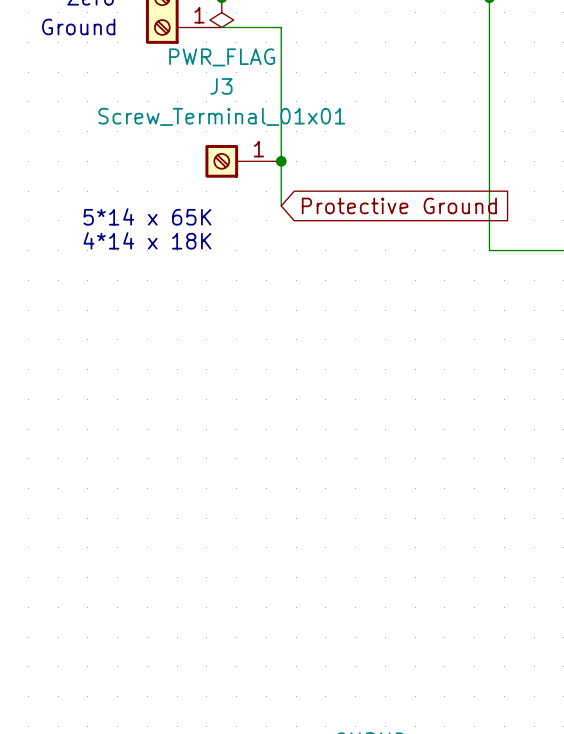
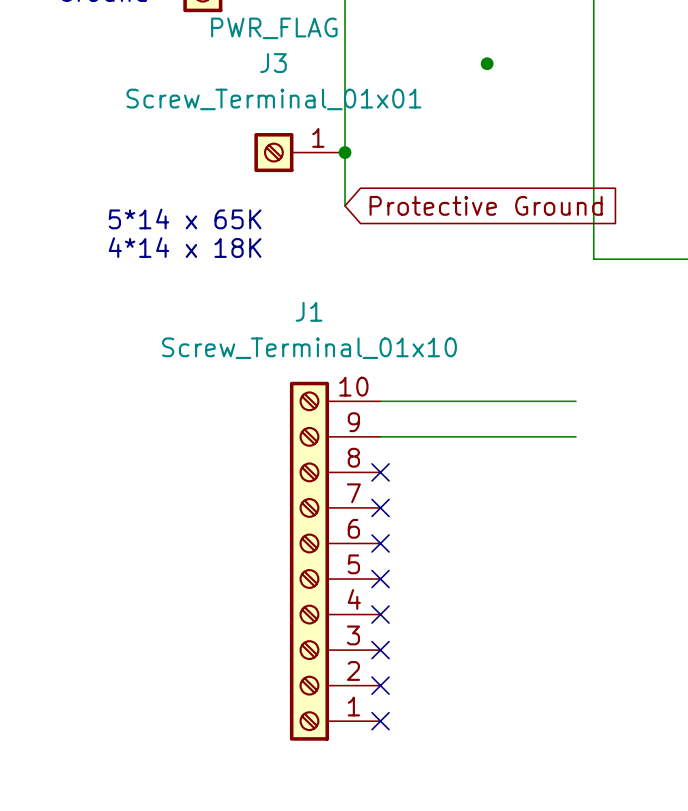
junction: none -> (487, 63)
wire: none -> (380, 401) (575, 401)
wire: none -> (380, 436) (575, 436)
no-connect mark: none -> (380, 472)
no-connect mark: none -> (380, 507)
no-connect mark: none -> (380, 543)
J1: none -> Screw_Terminal_01x10 (335, 561)
no-connect mark: none -> (380, 579)
no-connect mark: none -> (380, 614)
no-connect mark: none -> (380, 650)
no-connect mark: none -> (380, 685)
no-connect mark: none -> (380, 721)

